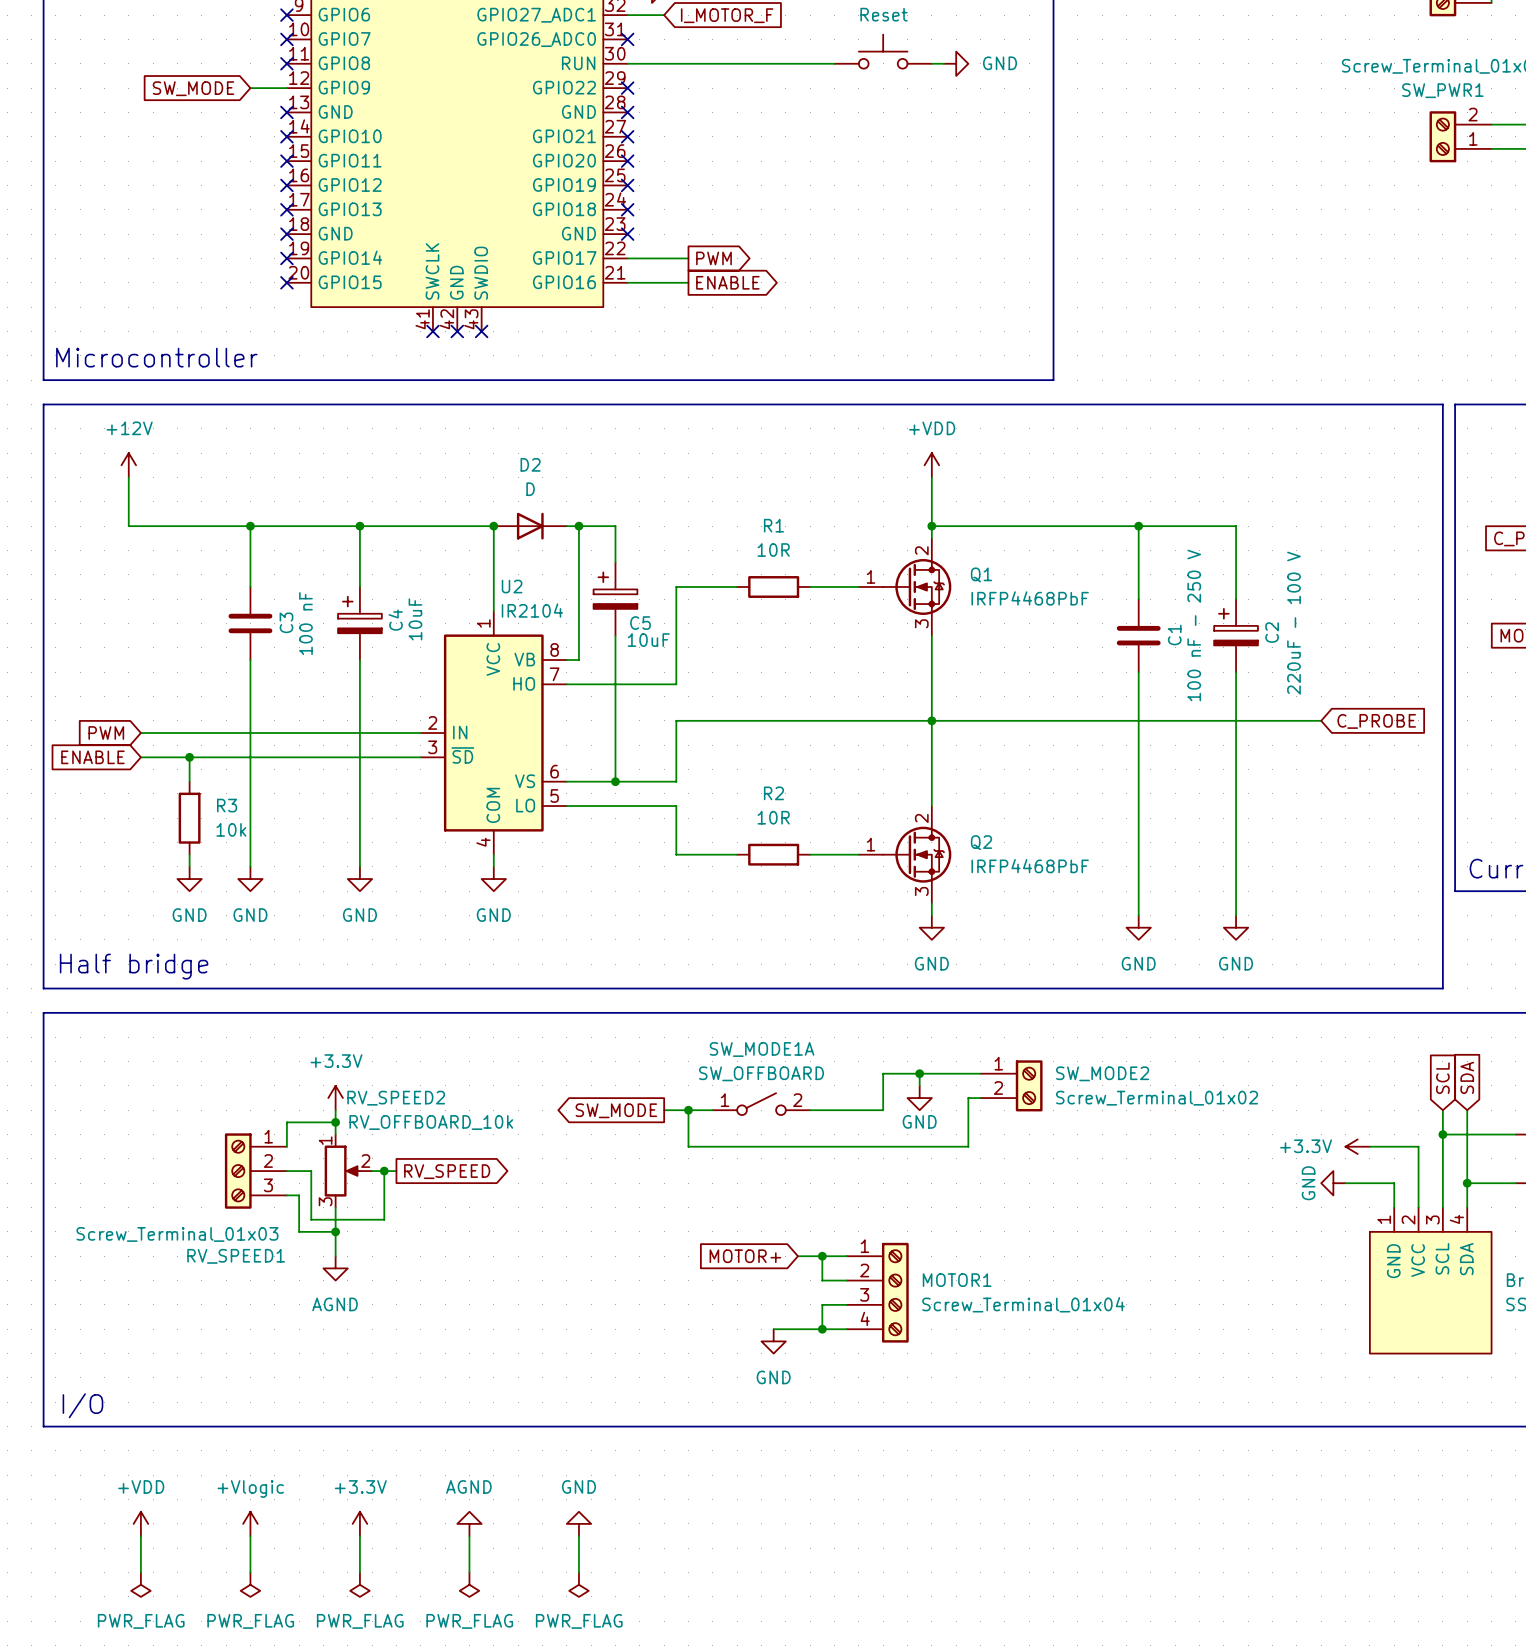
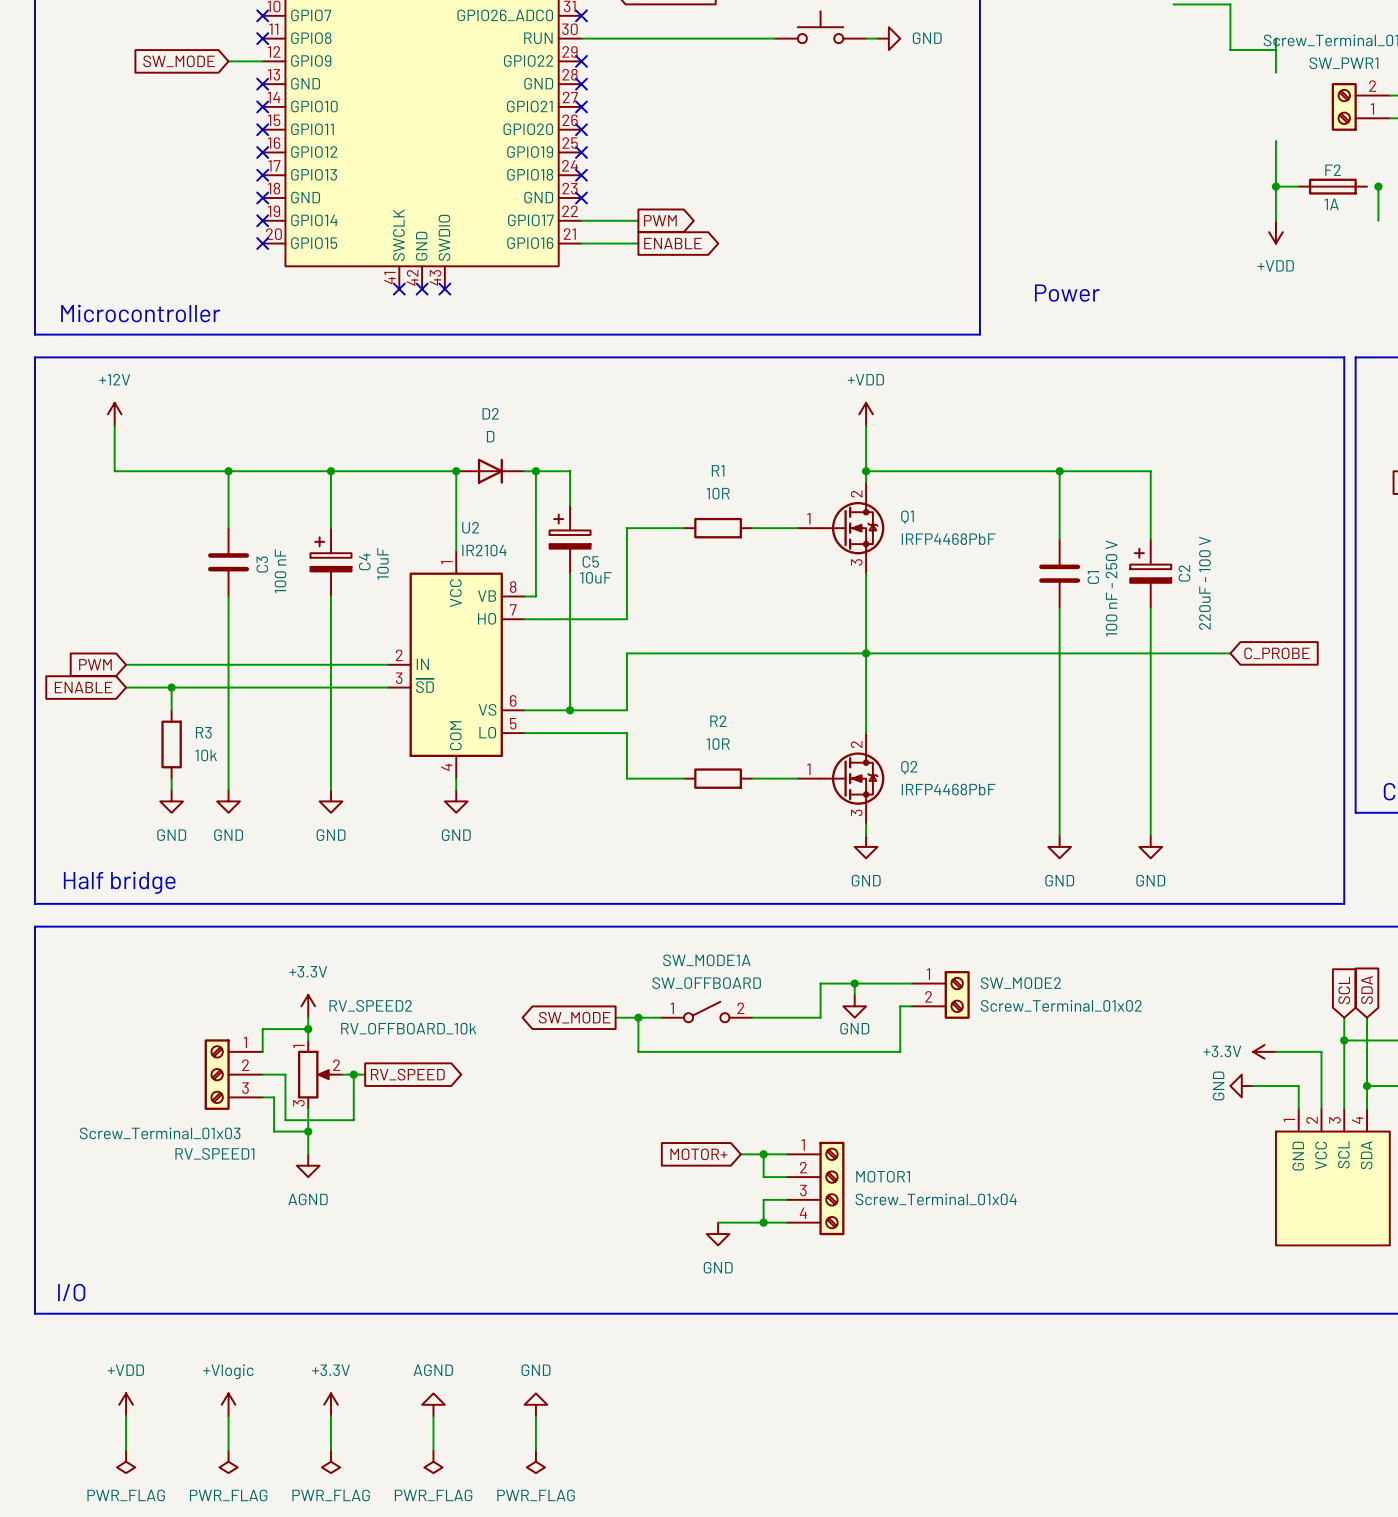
wire: none -> (1173, 4) (1230, 4) (1230, 50) (1275, 50)
wire: none -> (1275, 38) (1275, 72)
wire: none -> (1275, 141) (1275, 220)
wire: none -> (1275, 186) (1298, 186)
junction: none -> (1275, 186)
F2: none -> 1A (1332, 186)
wire: none -> (1378, 186) (1378, 220)
junction: none -> (1378, 186)
power symbol: none -> +VDD (1275, 232)
text: none -> Power (1067, 293)

